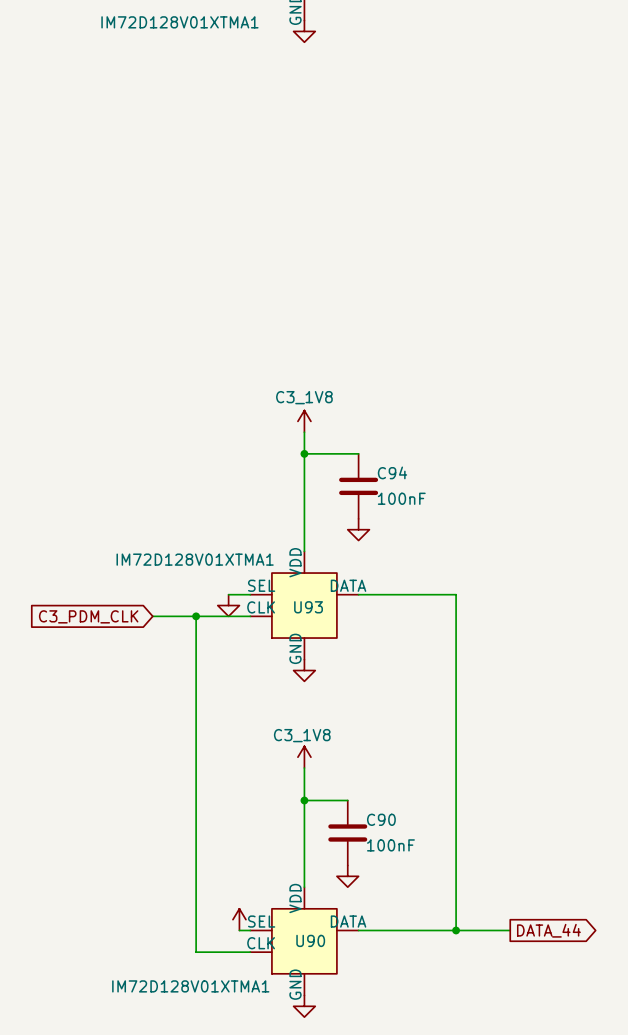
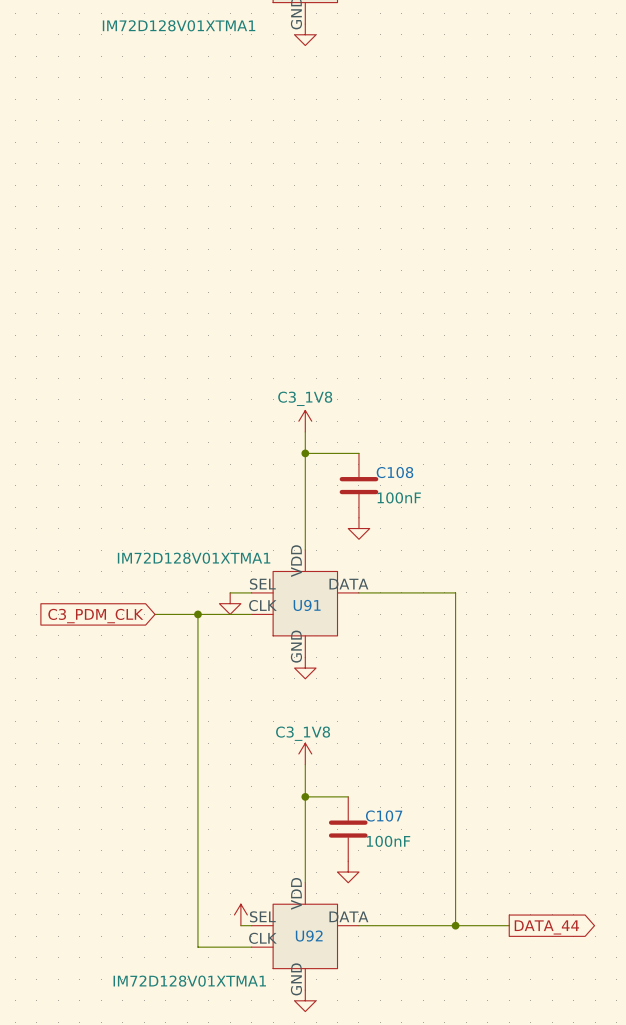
C94 name: C94 (392, 472) -> C108 (394, 472)
U93 name: U93 (308, 607) -> U91 (307, 605)
C90 name: C90 (381, 819) -> C107 (384, 816)
U90 name: U90 (310, 940) -> U92 (309, 936)

